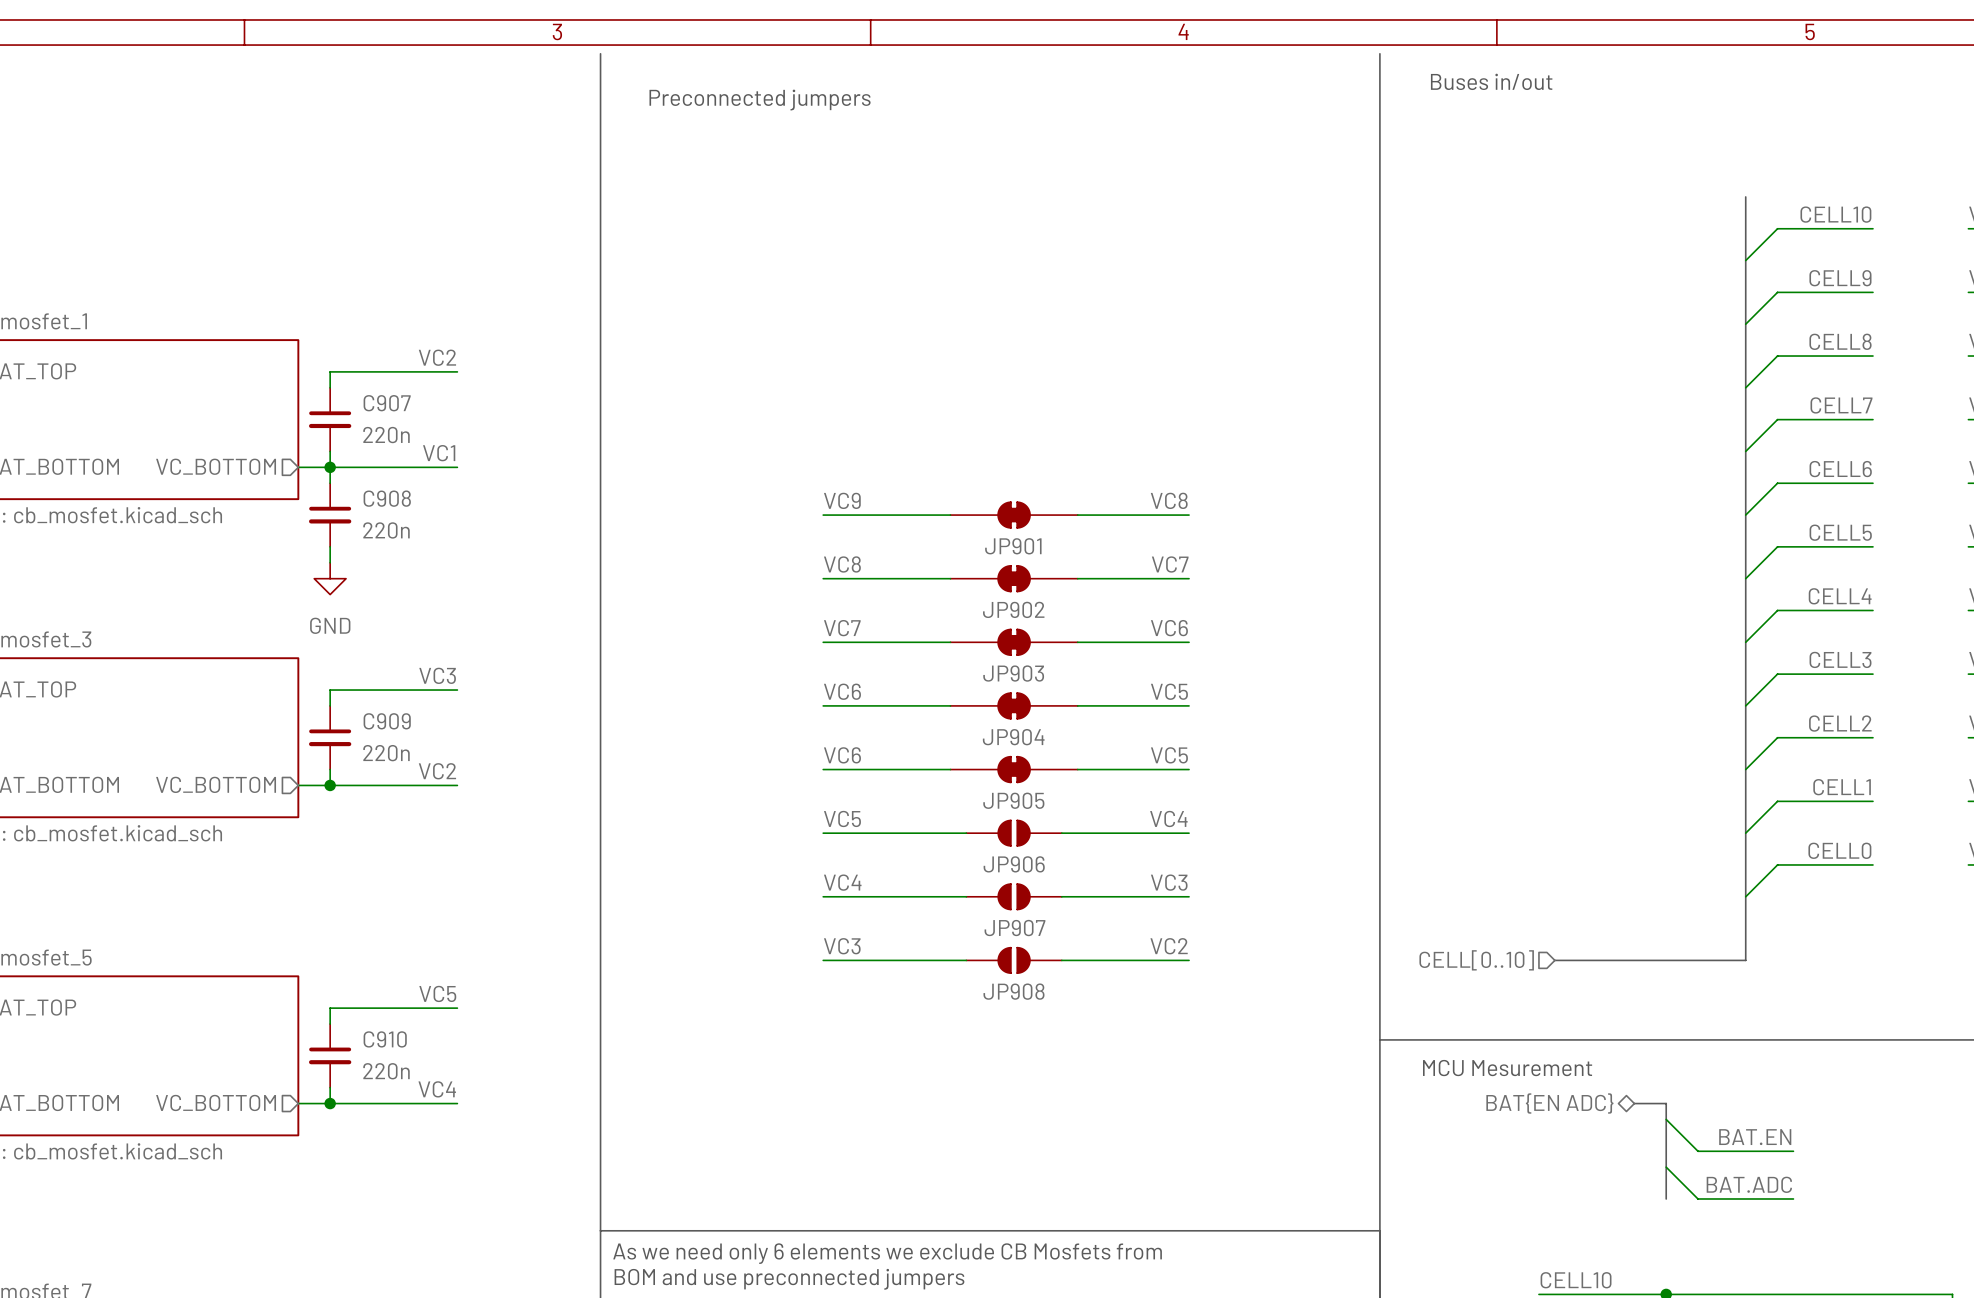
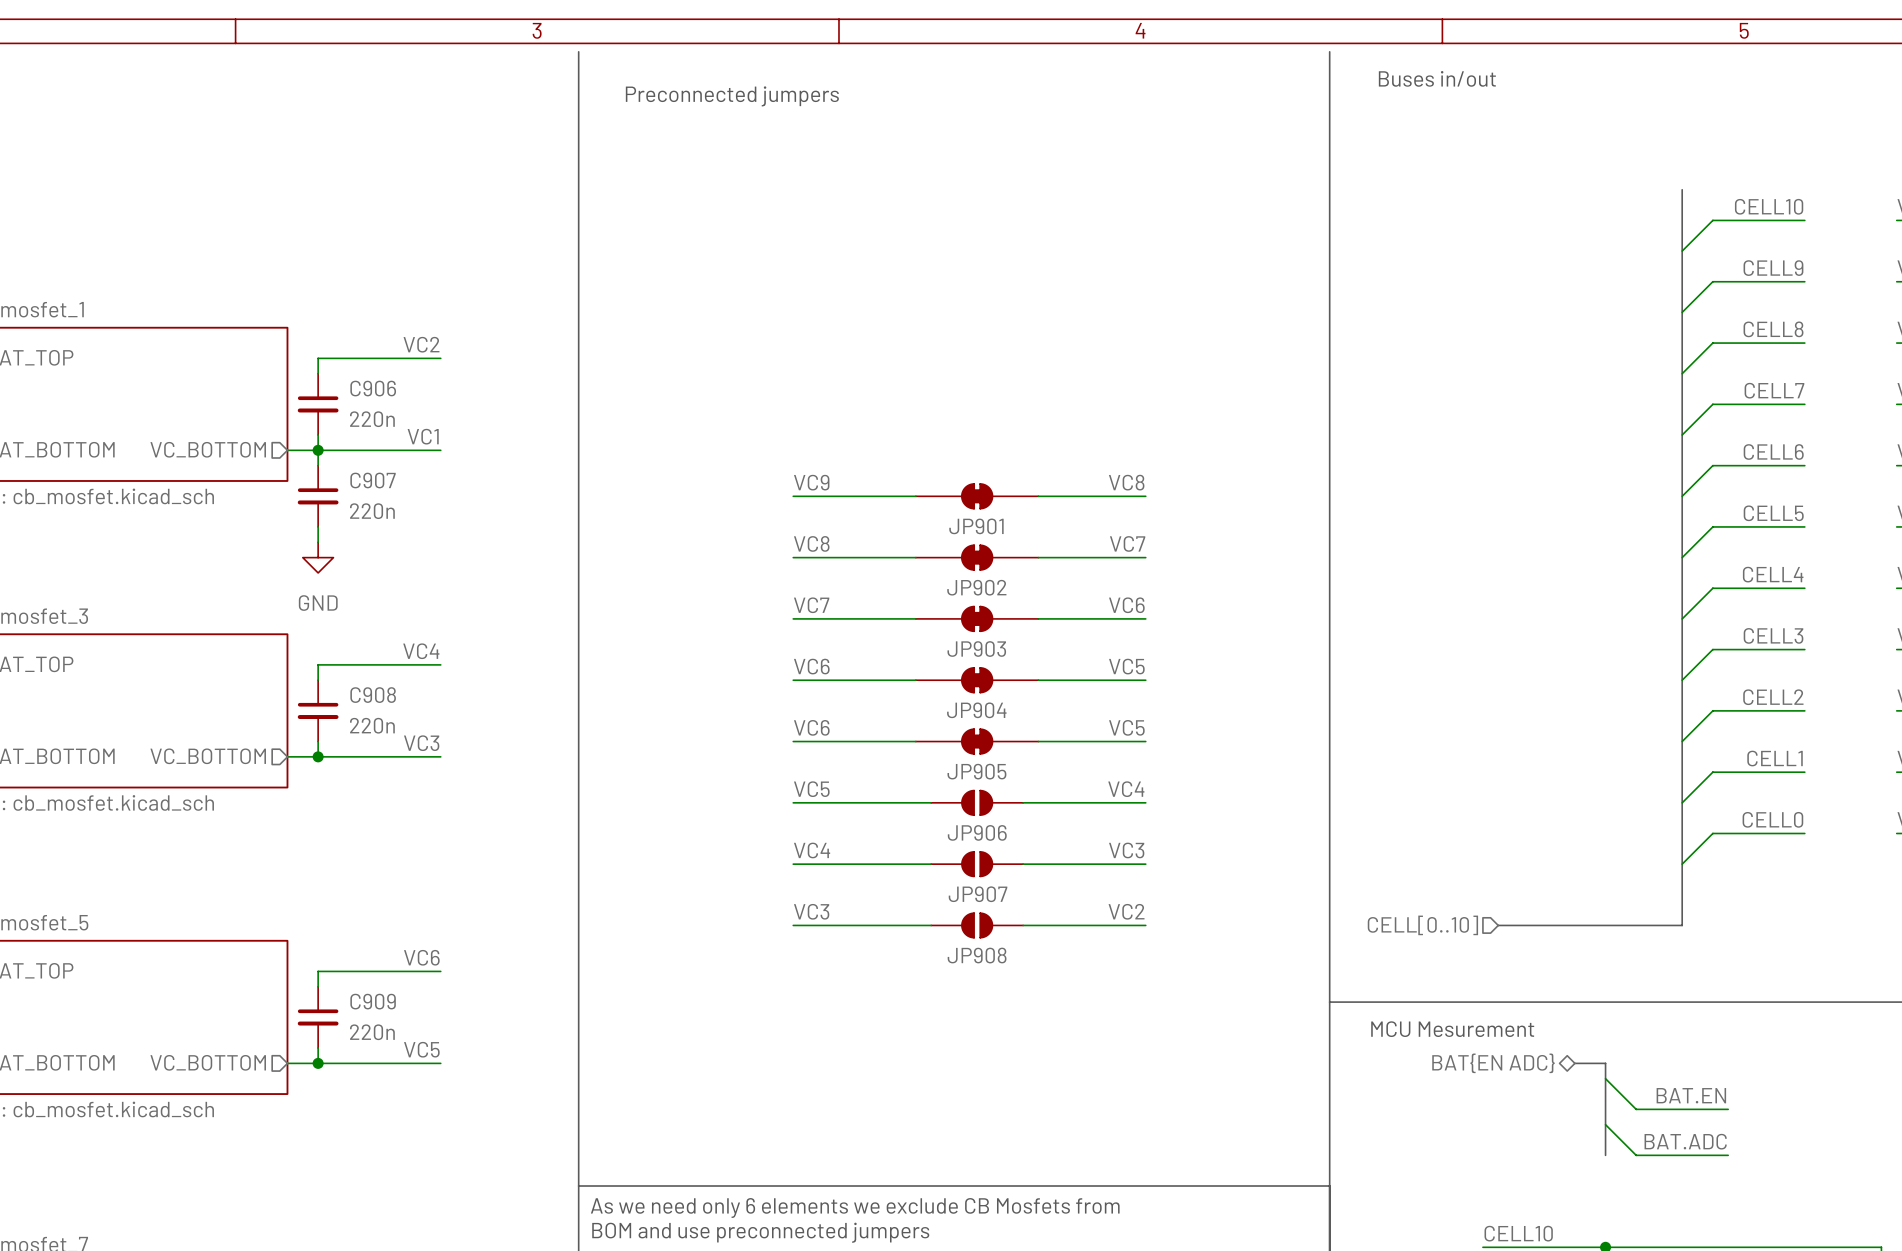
C907 name: C907 (387, 403) -> C906 (373, 388)
C908 name: C908 (387, 498) -> C907 (373, 480)
label: VC3 (437, 675) -> VC4 (421, 651)
C909 name: C909 (387, 721) -> C908 (373, 695)
label: VC2 (437, 771) -> VC3 (421, 743)
label: VC5 (437, 993) -> VC6 (421, 957)
C910 name: C910 (385, 1039) -> C909 (373, 1001)
label: VC4 (437, 1089) -> VC5 (421, 1049)

